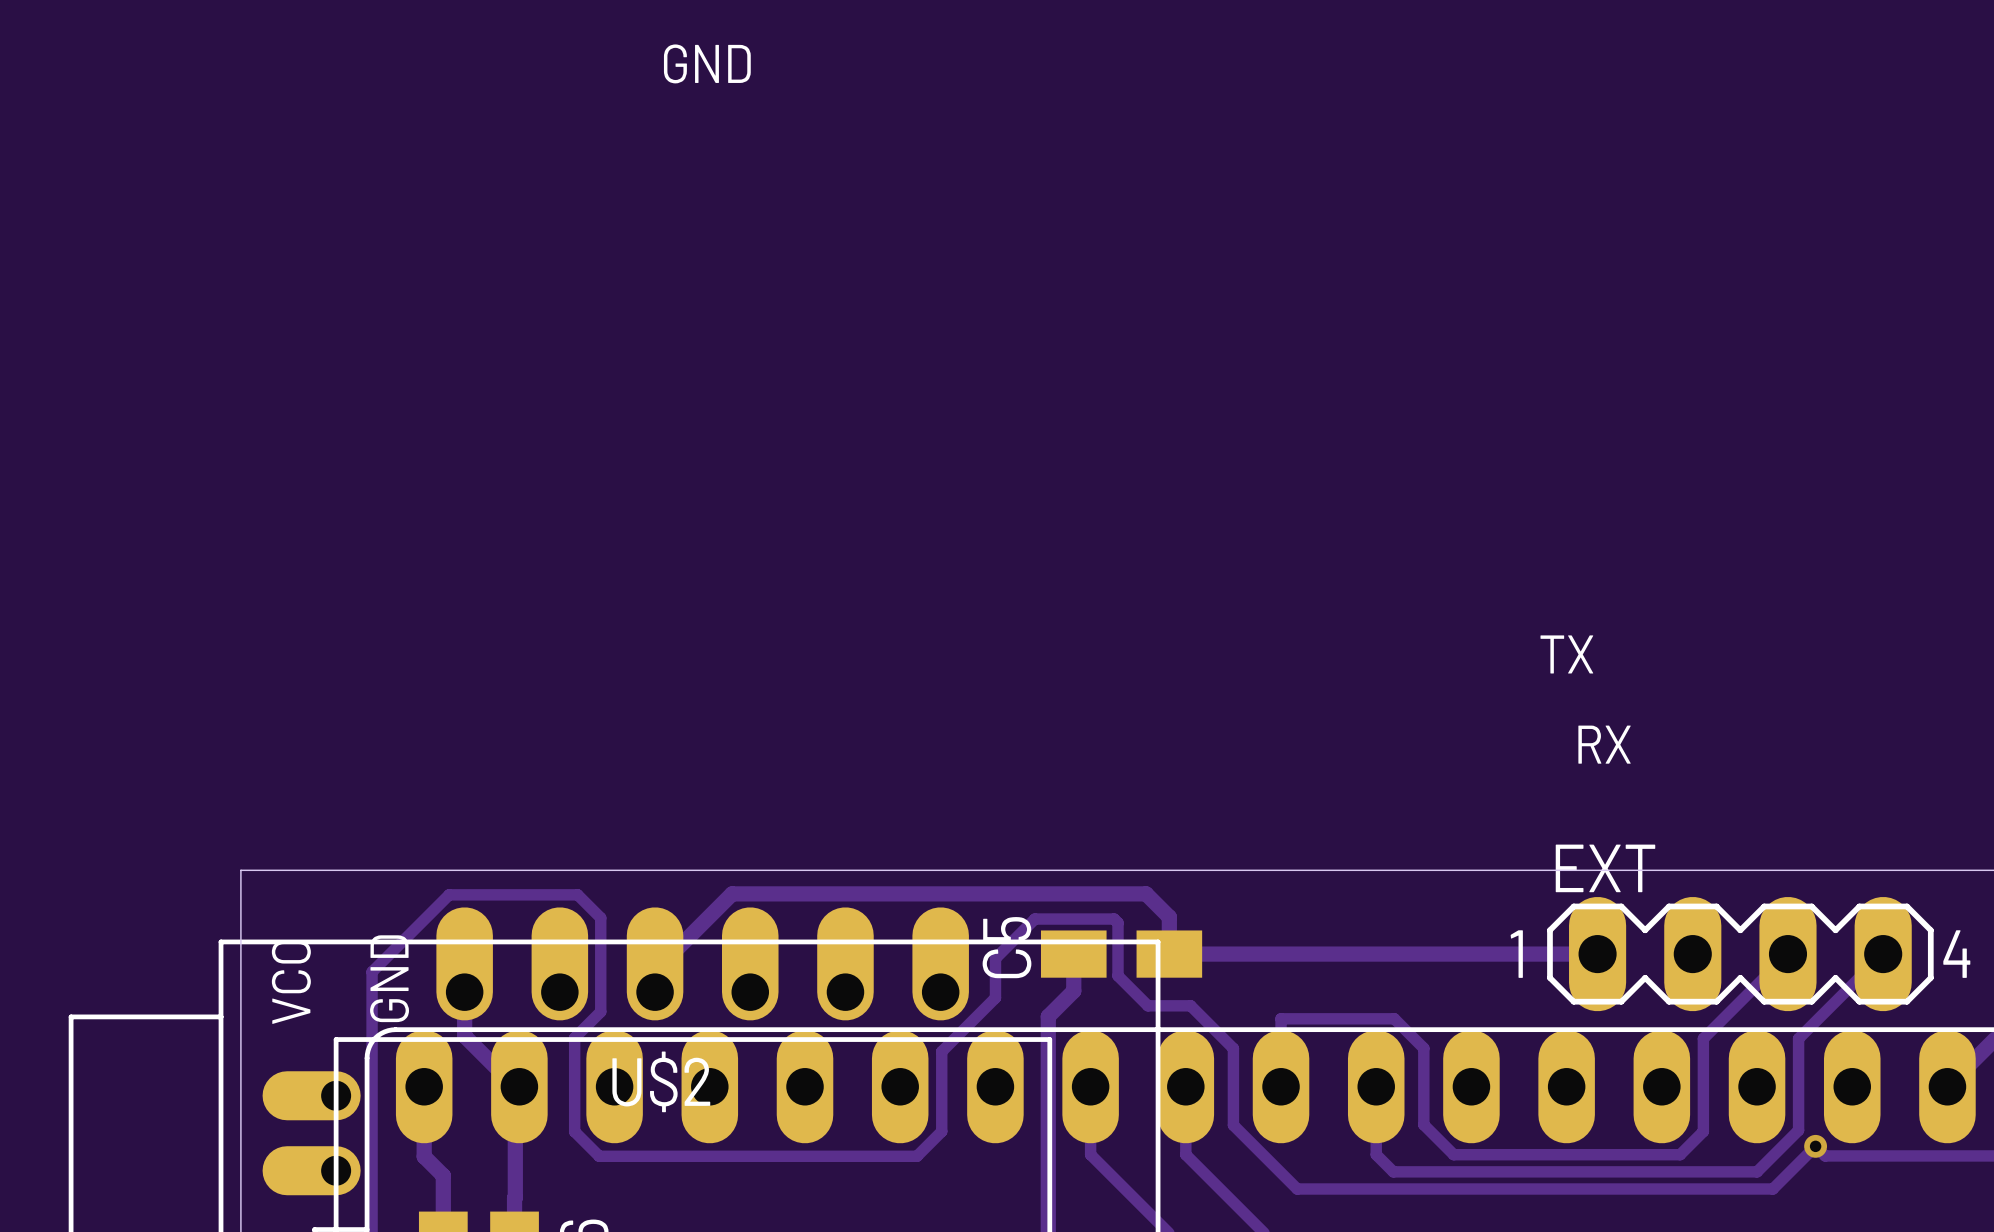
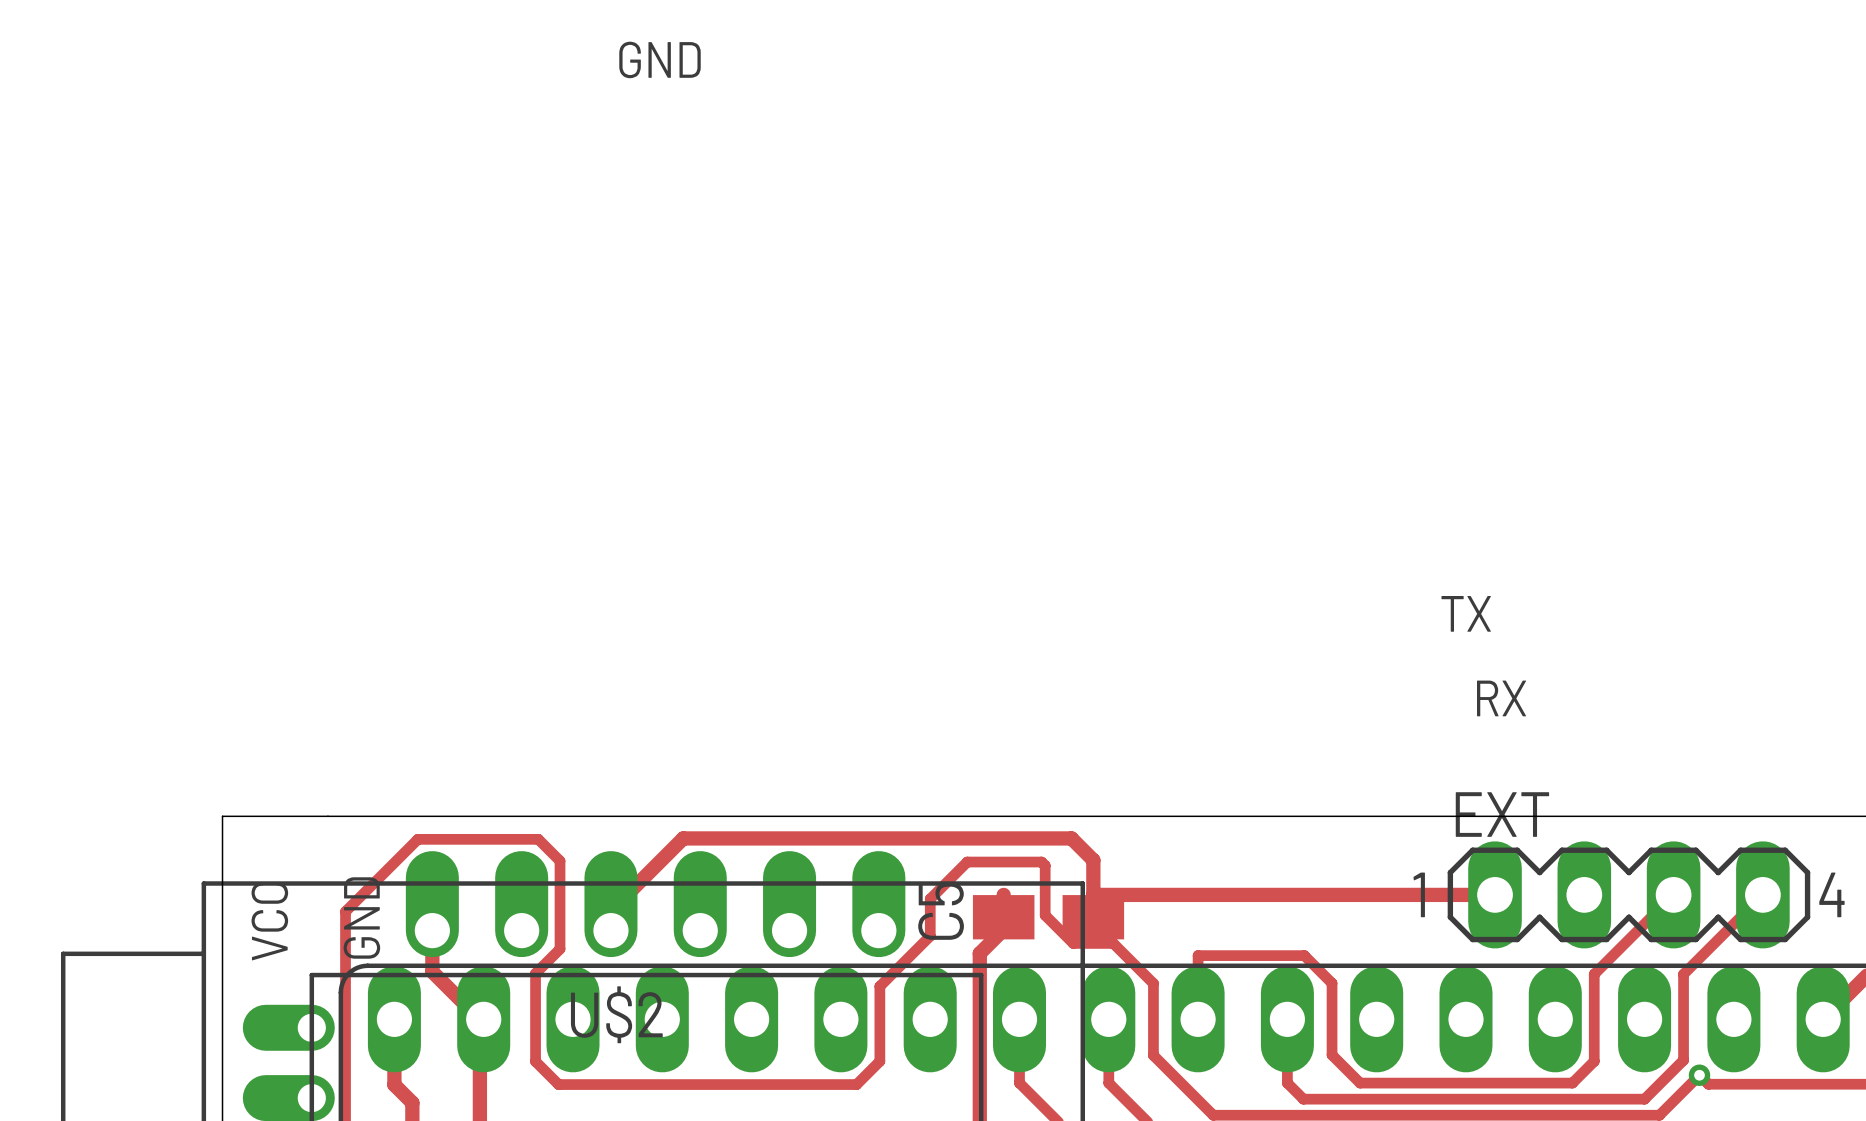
C5 position: (1121, 954) -> (1048, 917)

